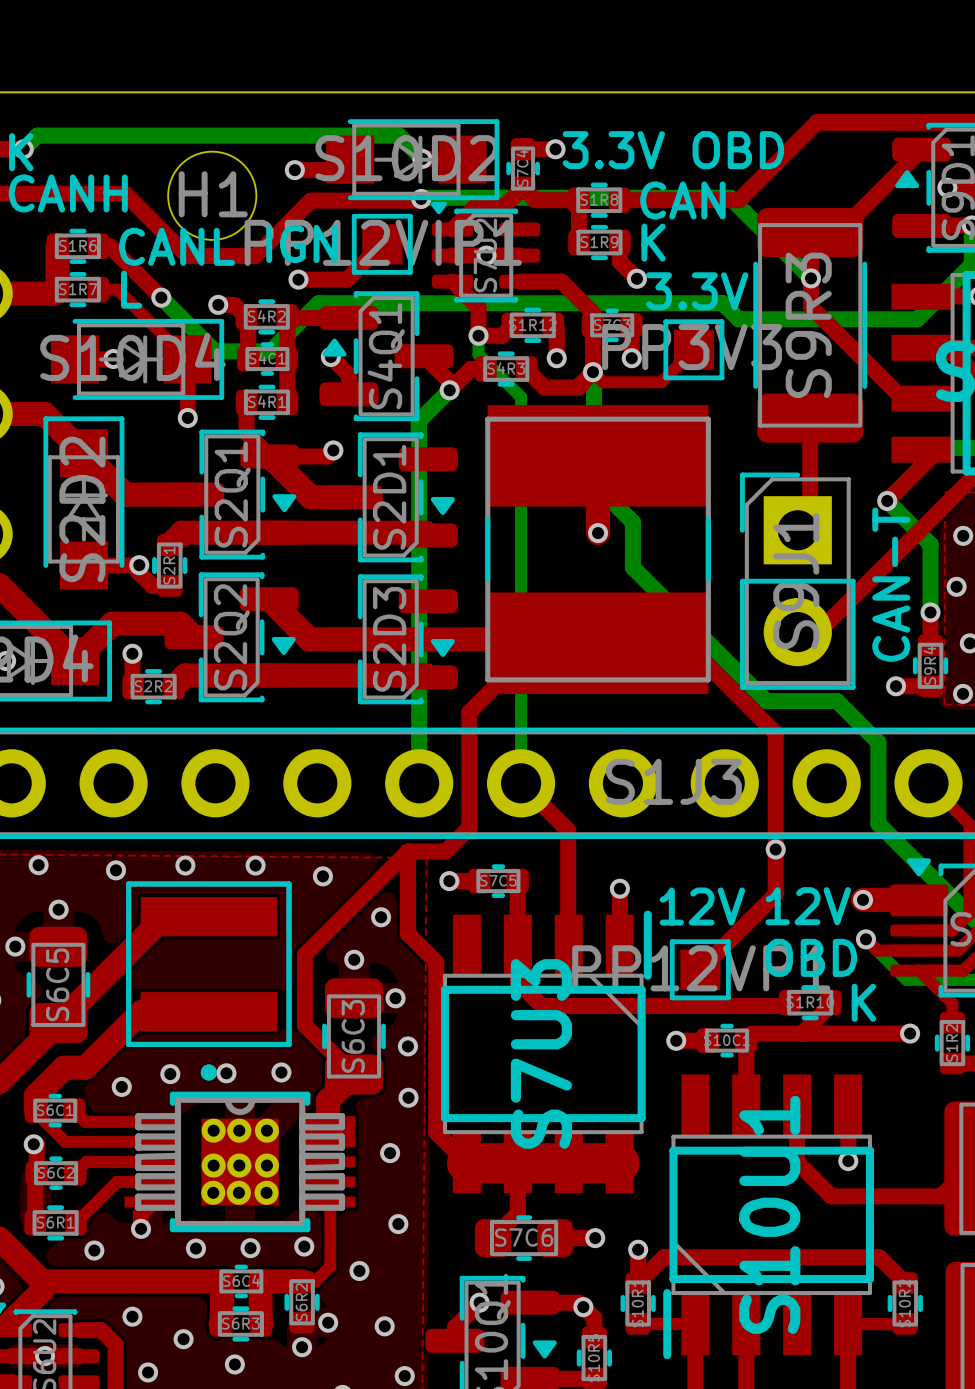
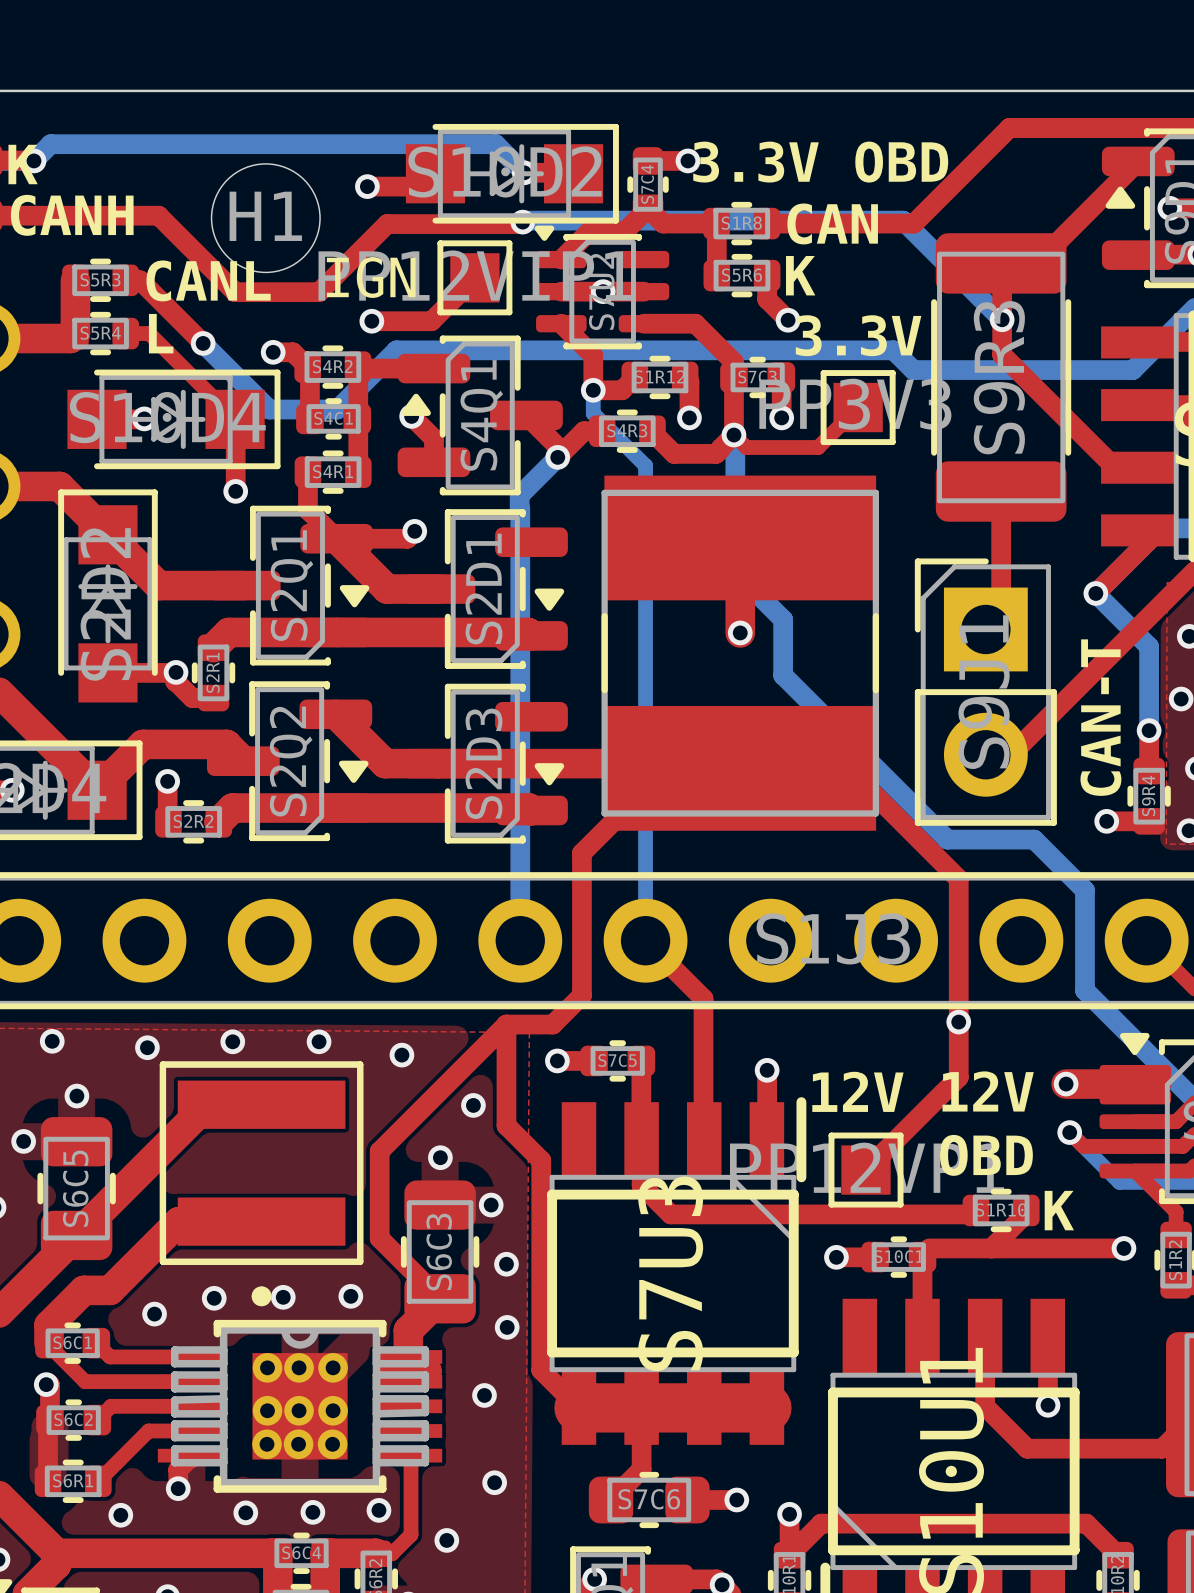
S1R9 name: S1R9 (599, 242) -> S5R6 (742, 275)
S1R6 name: S1R6 (77, 245) -> S5R3 (100, 279)
S1R7 name: S1R7 (78, 289) -> S5R4 (100, 333)

